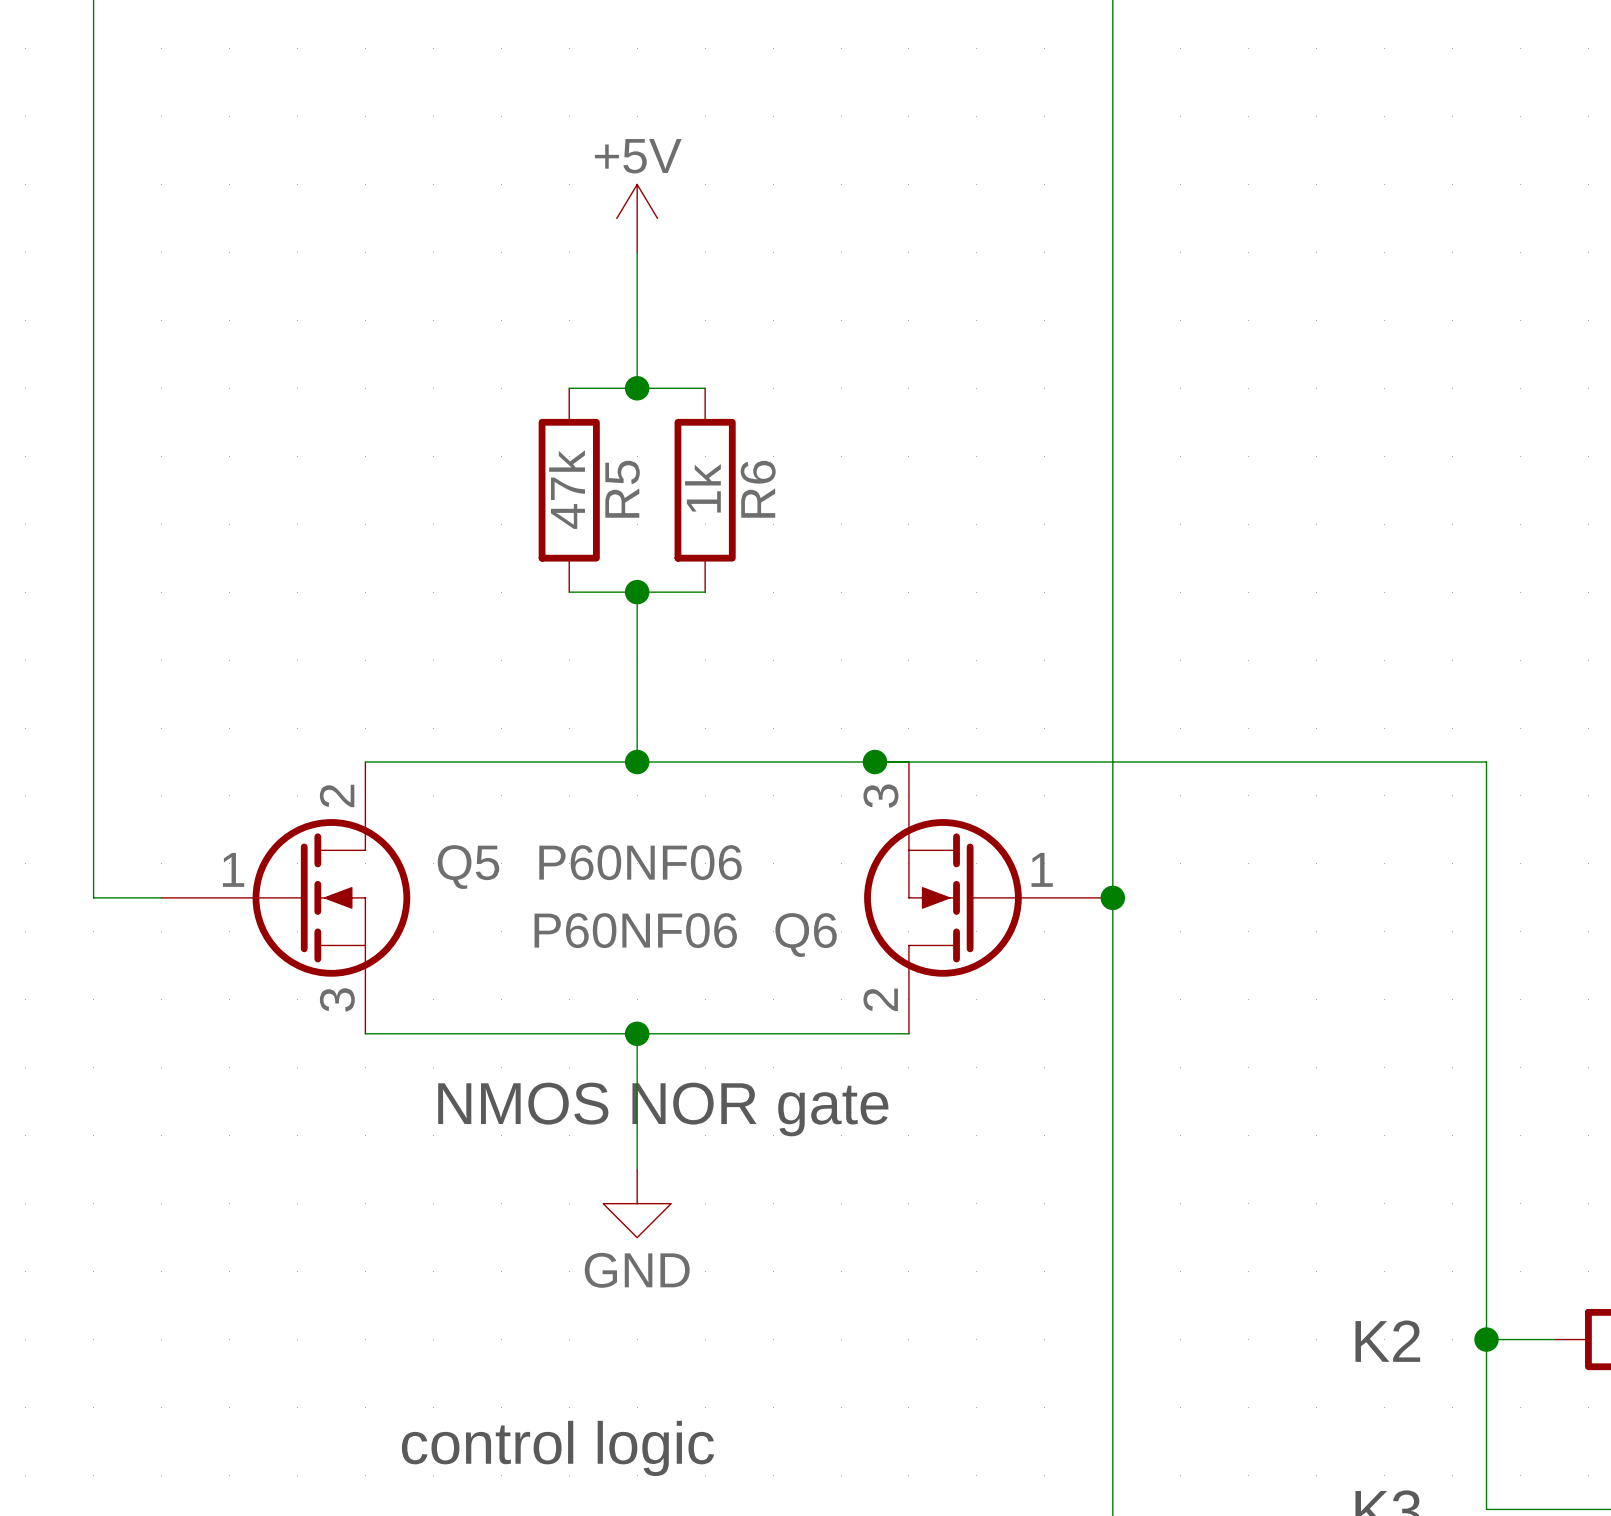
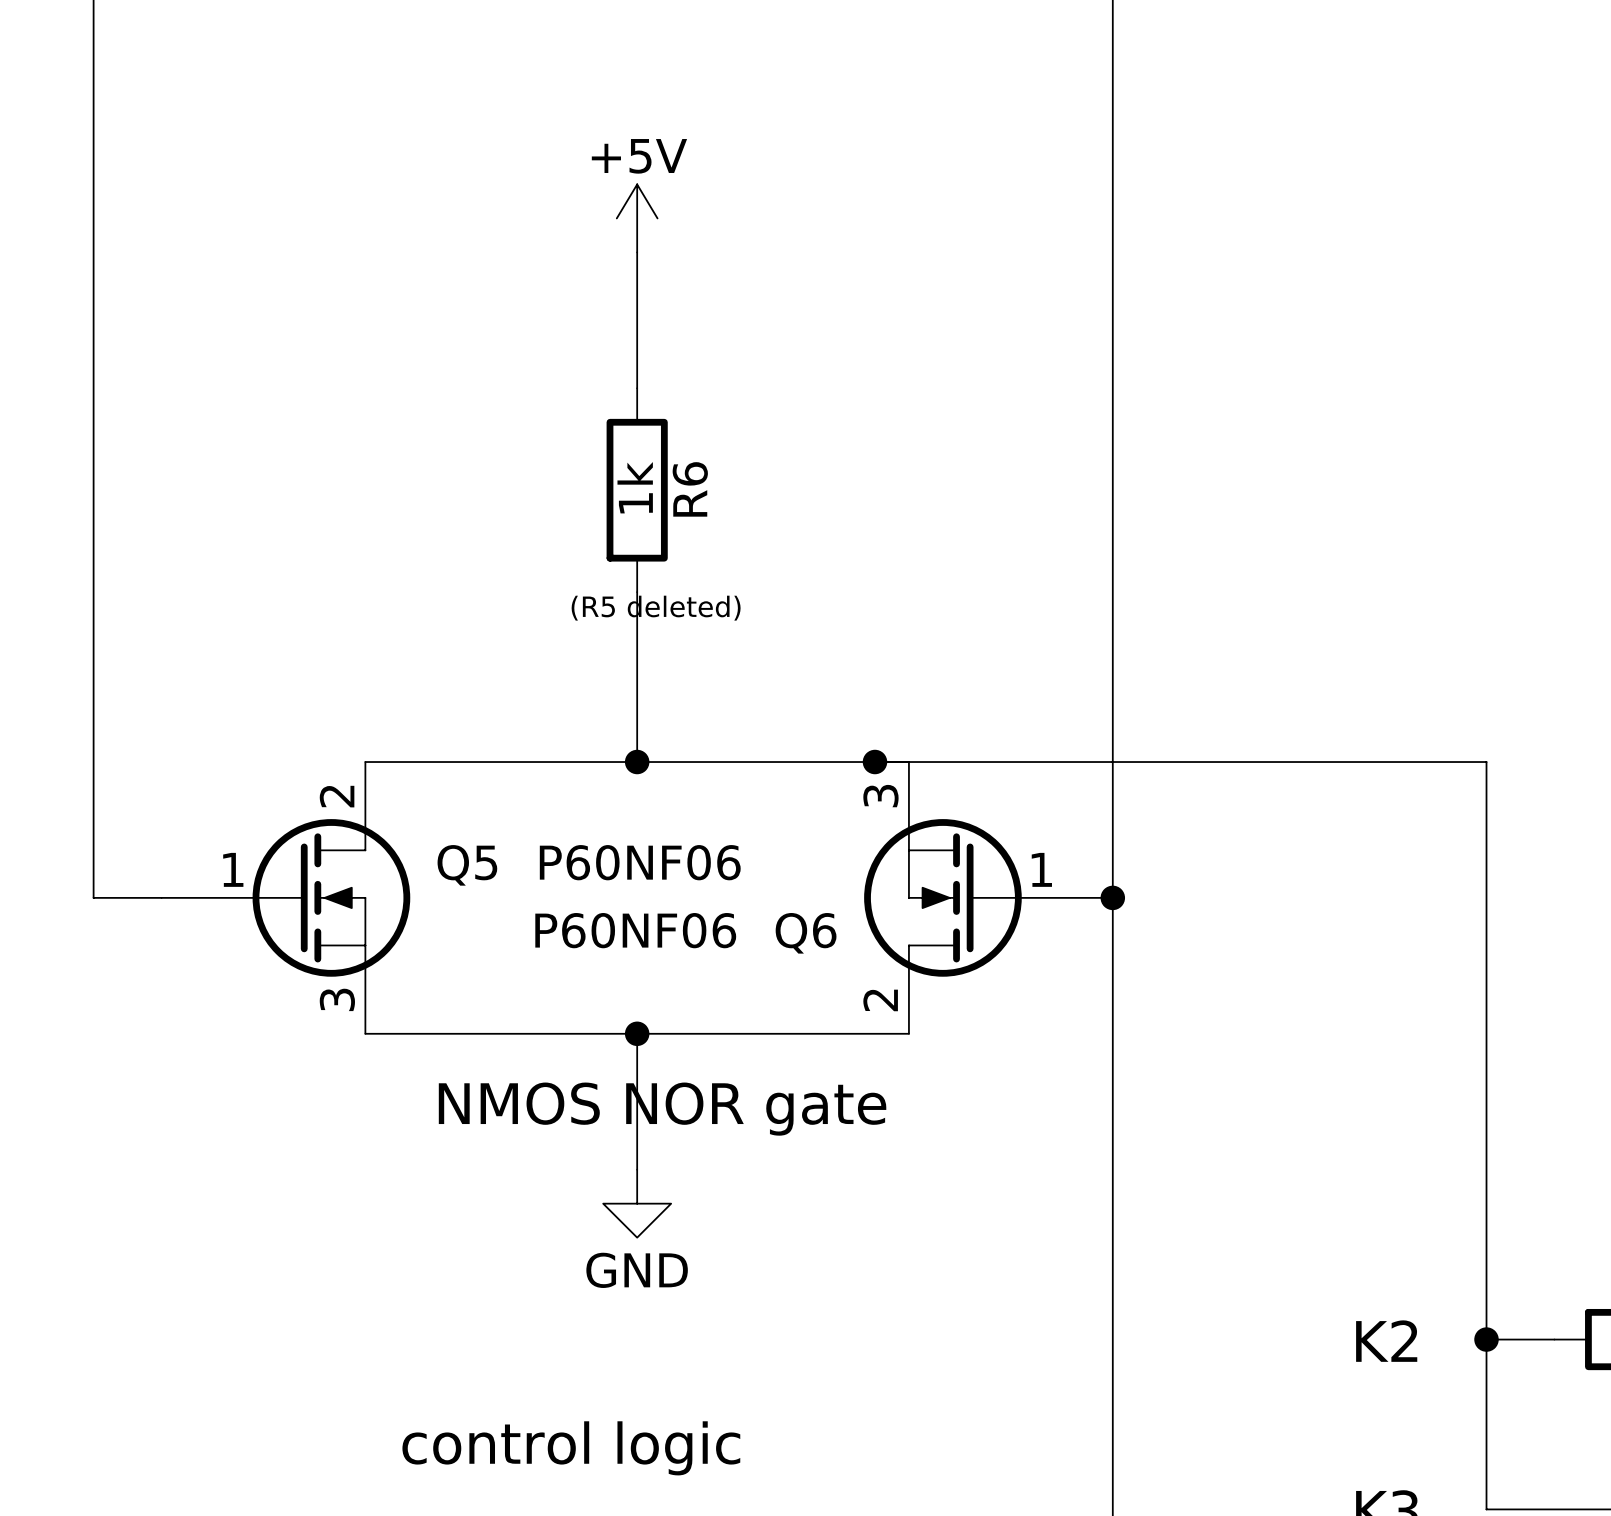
wire: (569, 388) (705, 388) -> none
junction: (637, 388) -> none
R5: 47k (569, 490) -> none
R6 position: (705, 490) -> (637, 490)
wire: (569, 592) (705, 592) -> none
junction: (637, 592) -> none
text: none -> (R5 deleted) (656, 608)

